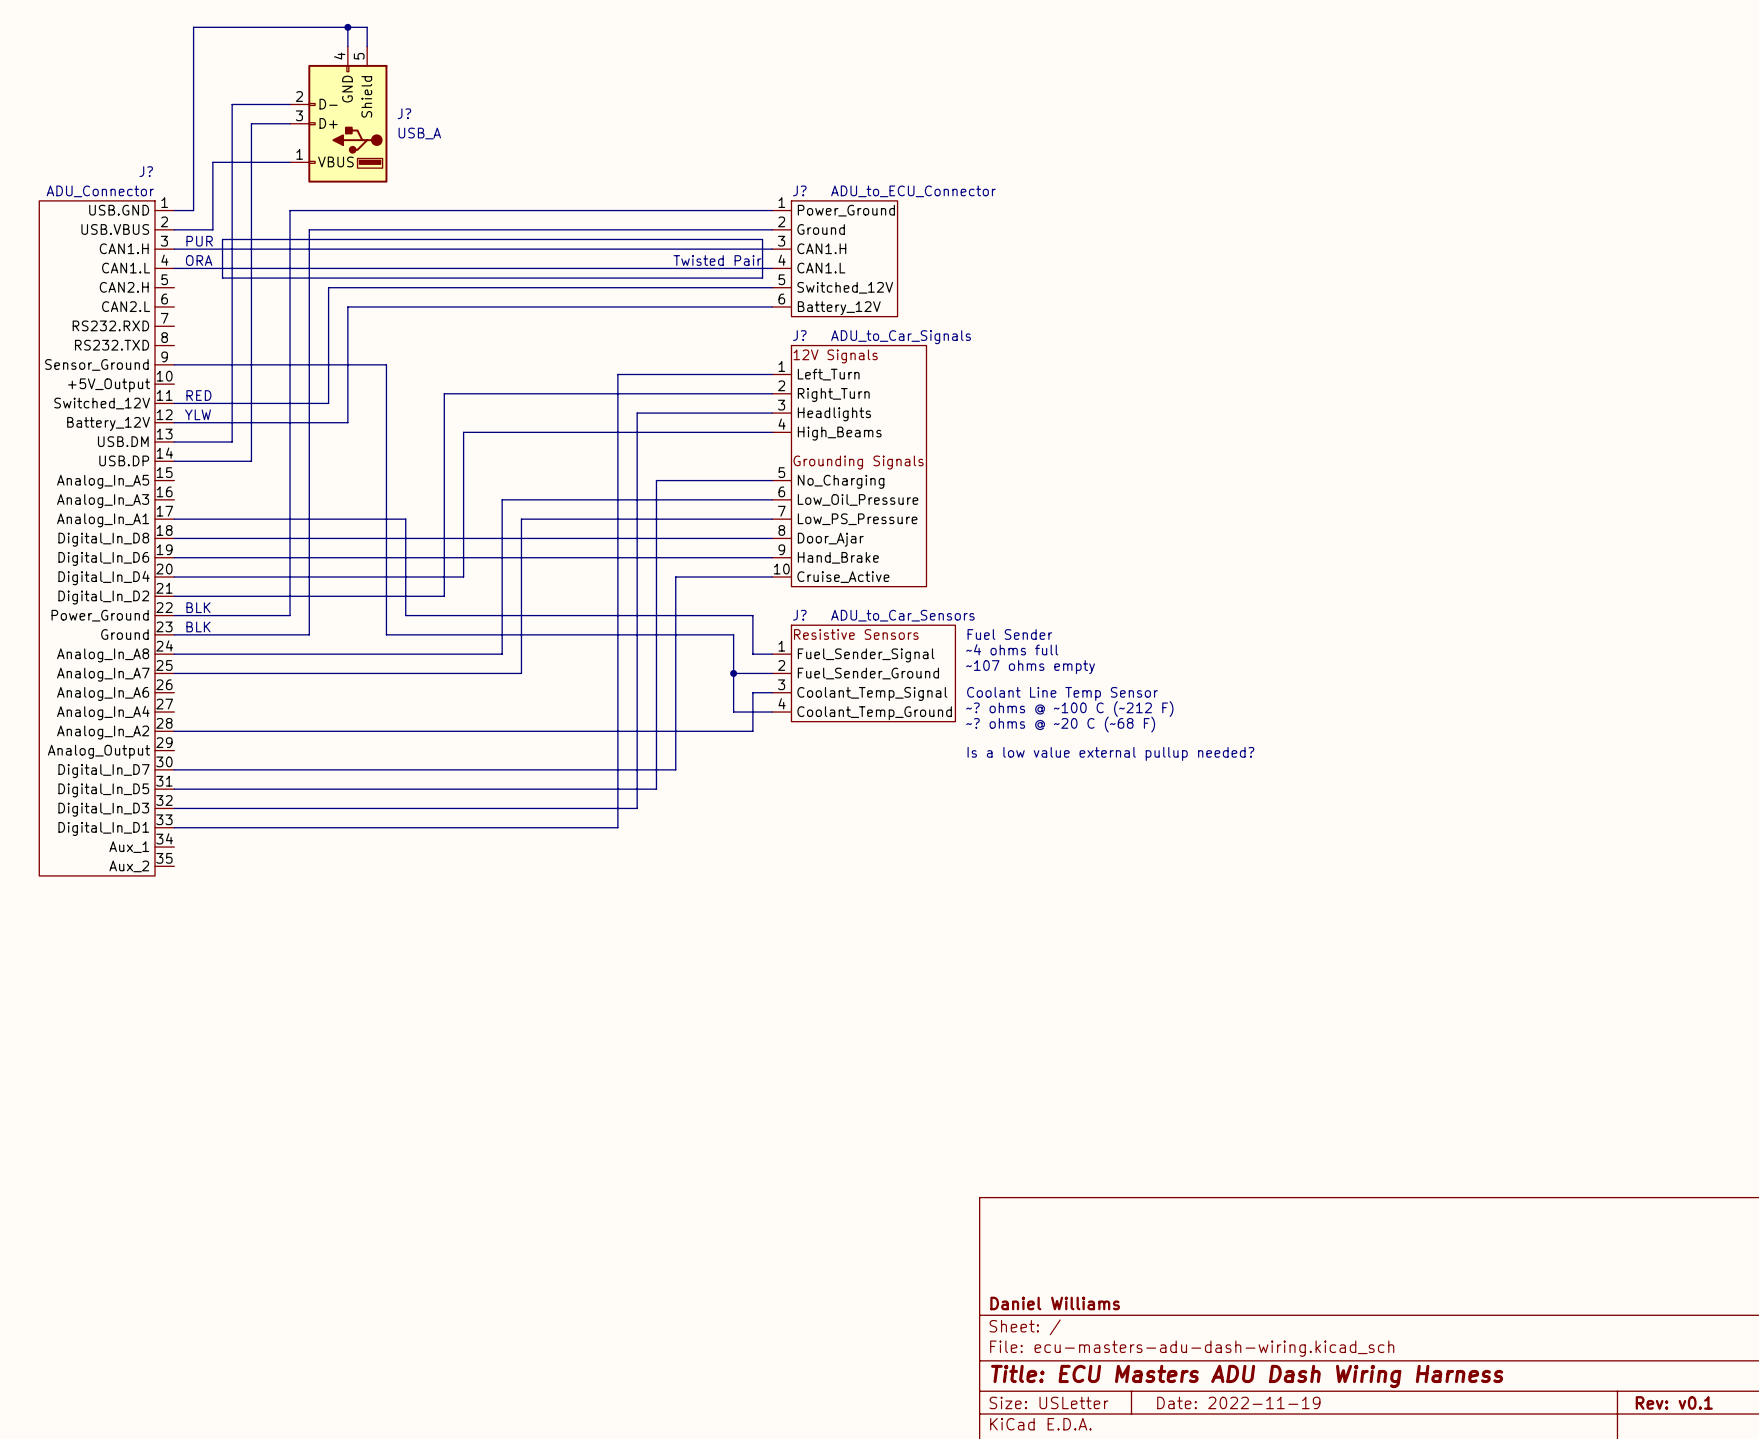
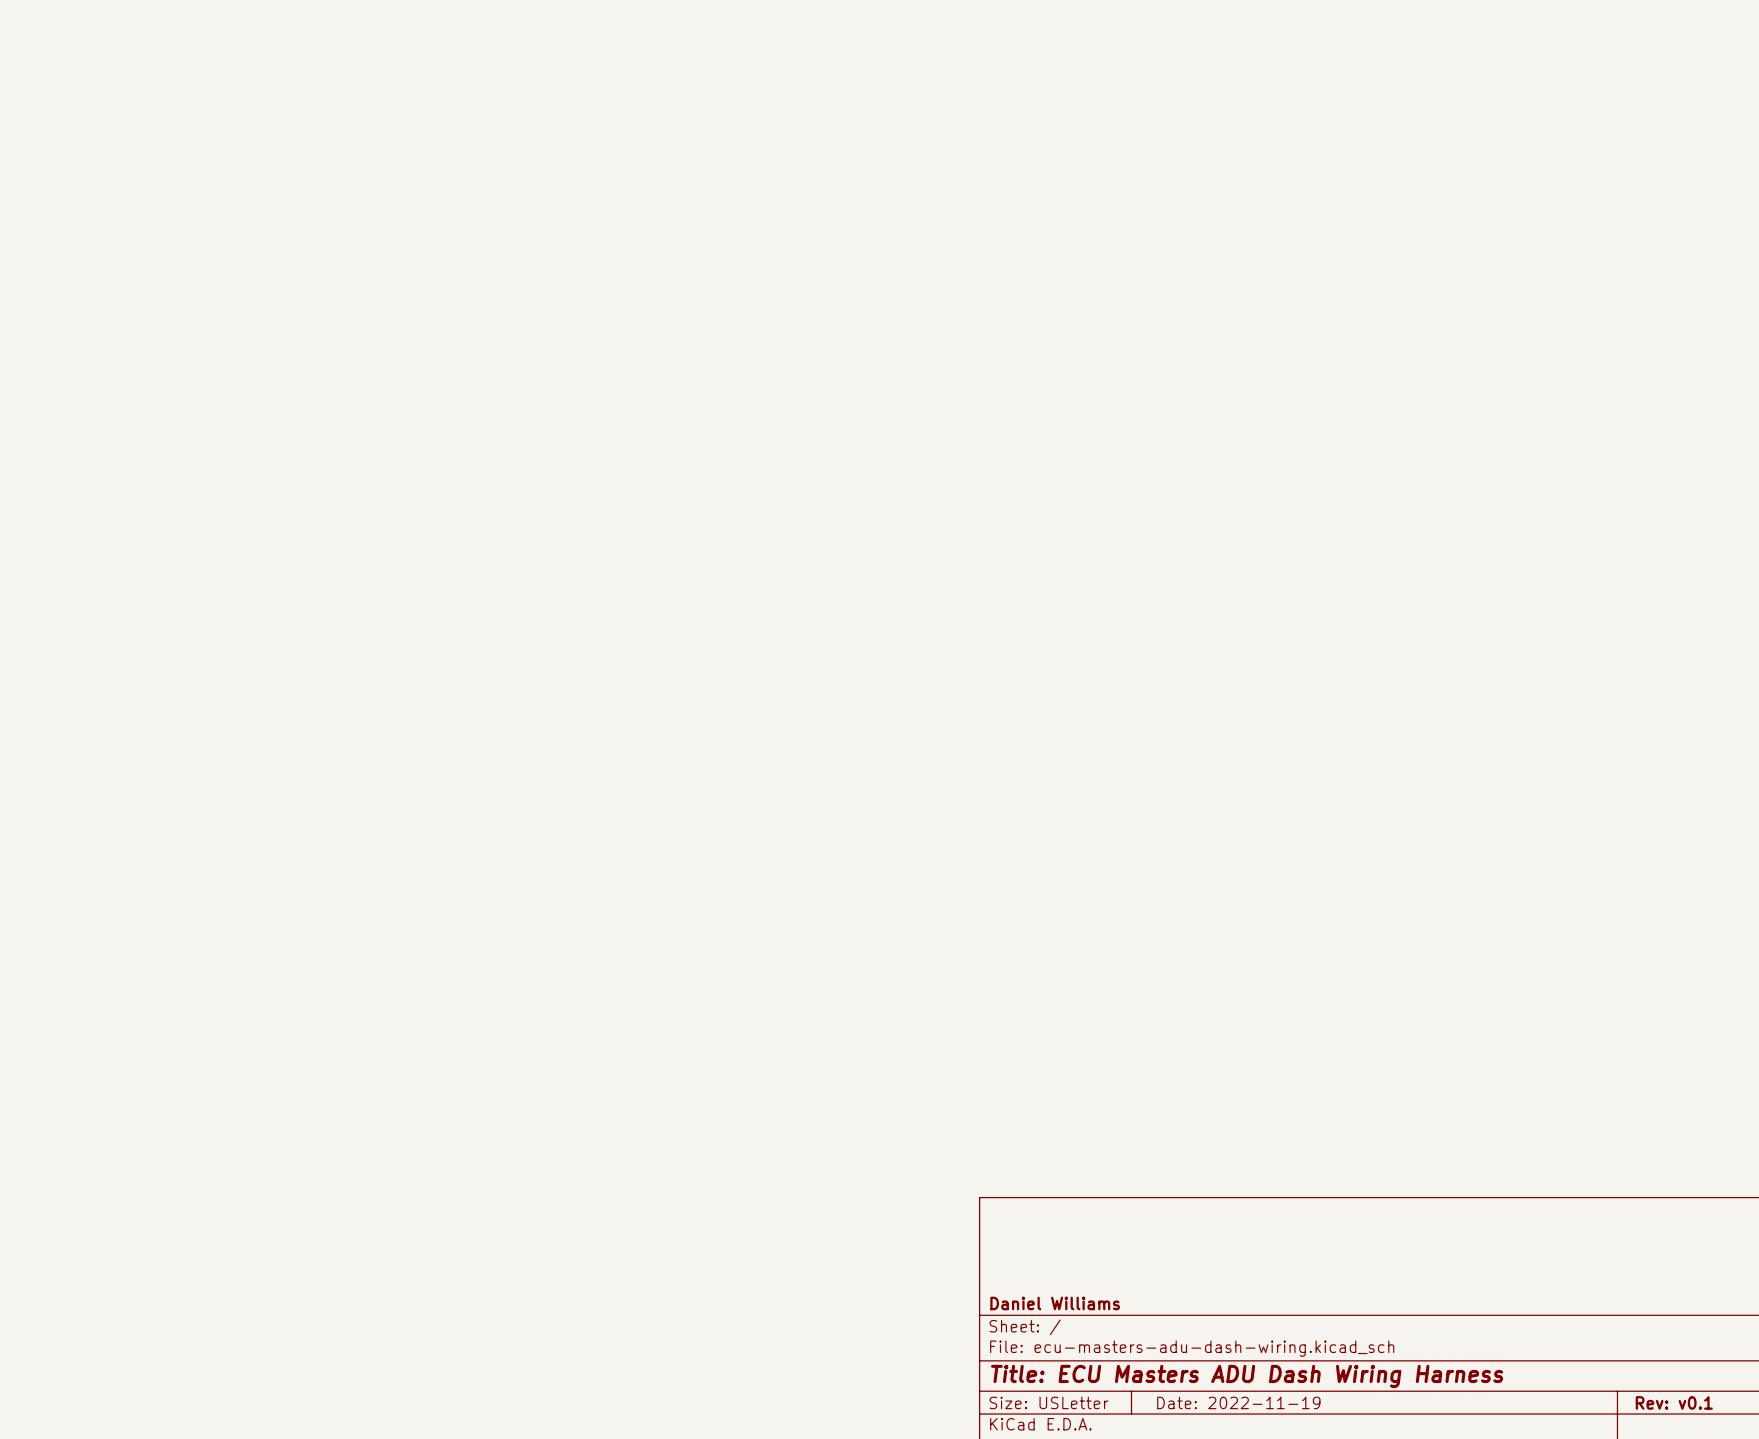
wire: (347, 27) (347, 46) -> none
junction: (347, 27) -> none
wire: (367, 46) (367, 27) (193, 27) (193, 210) (174, 210) -> none
wire: (290, 104) (232, 104) (232, 441) (174, 441) -> none
J?: USB_A (338, 114) -> none
wire: (290, 123) (251, 123) (251, 461) (174, 461) -> none
wire: (290, 162) (212, 162) (212, 229) (174, 229) -> none
wire: (772, 210) (290, 210) (290, 615) (174, 615) -> none
wire: (772, 229) (309, 229) (309, 634) (174, 634) -> none
line: (222, 239) (222, 278) (762, 278) (762, 239) (222, 239) -> none
text: PUR (199, 241) -> none
wire: (174, 249) (772, 249) -> none
J?: ADU_to_ECU_Connector (834, 258) -> none
text: ORA (199, 260) -> none
text: Twisted Pair (717, 260) -> none
wire: (174, 268) (772, 268) -> none
wire: (772, 287) (328, 287) (328, 403) (174, 403) -> none
wire: (772, 306) (347, 306) (347, 422) (174, 422) -> none
wire: (174, 364) (386, 364) (386, 634) (733, 634) (733, 712) (772, 712) -> none
wire: (772, 374) (617, 374) (617, 827) (174, 827) -> none
wire: (772, 393) (444, 393) (444, 596) (174, 596) -> none
text: RED (198, 395) -> none
wire: (772, 413) (637, 413) (637, 808) (174, 808) -> none
text: YLW (198, 414) -> none
wire: (772, 432) (463, 432) (463, 577) (174, 577) -> none
J?: ADU_to_Car_Signals (849, 466) -> none
wire: (772, 480) (656, 480) (656, 789) (174, 789) -> none
wire: (772, 499) (502, 499) (502, 654) (174, 654) -> none
wire: (174, 519) (405, 519) (405, 615) (752, 615) (752, 654) (772, 654) -> none
wire: (772, 519) (521, 519) (521, 673) (174, 673) -> none
J?: ADU_Connector (106, 538) -> none
wire: (174, 538) (772, 538) -> none
wire: (174, 557) (772, 557) -> none
wire: (772, 577) (675, 577) (675, 769) (174, 769) -> none
text: BLK (198, 607) -> none
text: BLK (198, 626) -> none
text: Fuel Sender (1009, 634) -> none
text: ~4 ohms full (1012, 649) -> none
text: ~107 ohms empty (1030, 667) -> none
wire: (733, 673) (772, 673) -> none
junction: (733, 673) -> none
J?: ADU_to_Car_Sensors (863, 673) -> none
wire: (772, 692) (752, 692) (752, 731) (174, 731) -> none
text: Coolant Line Temp Sensor (1062, 693) -> none
text: ~? ohms @ ~100 C (~212 F) (1069, 709) -> none
text: ~? ohms @ ~20 C (~68 F) (1060, 724) -> none
text: Is a low value external pullup needed? (1110, 753) -> none

